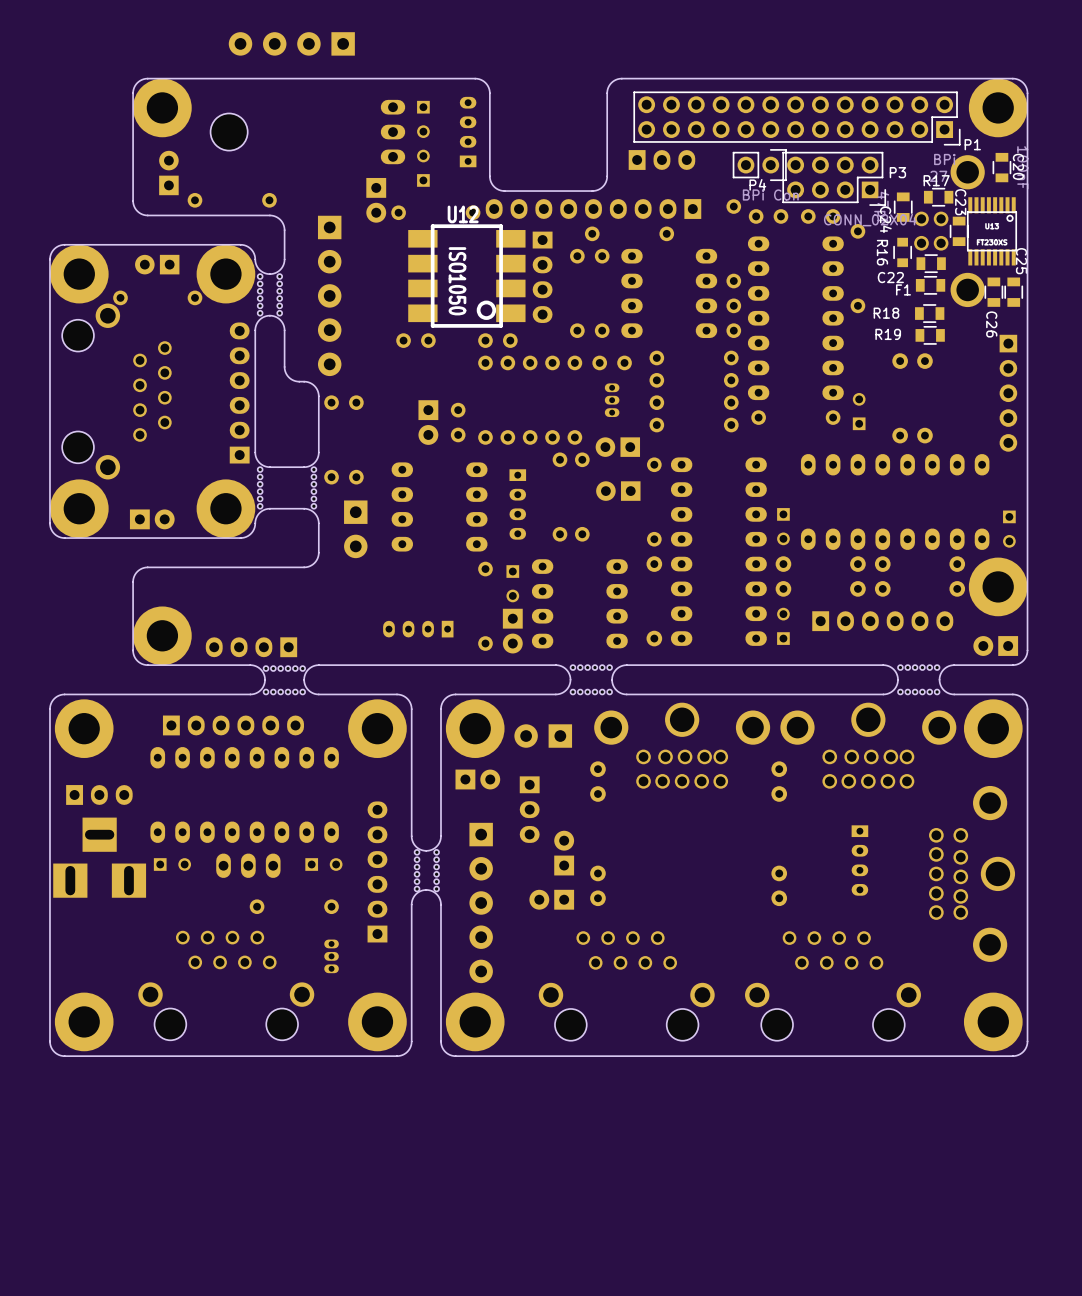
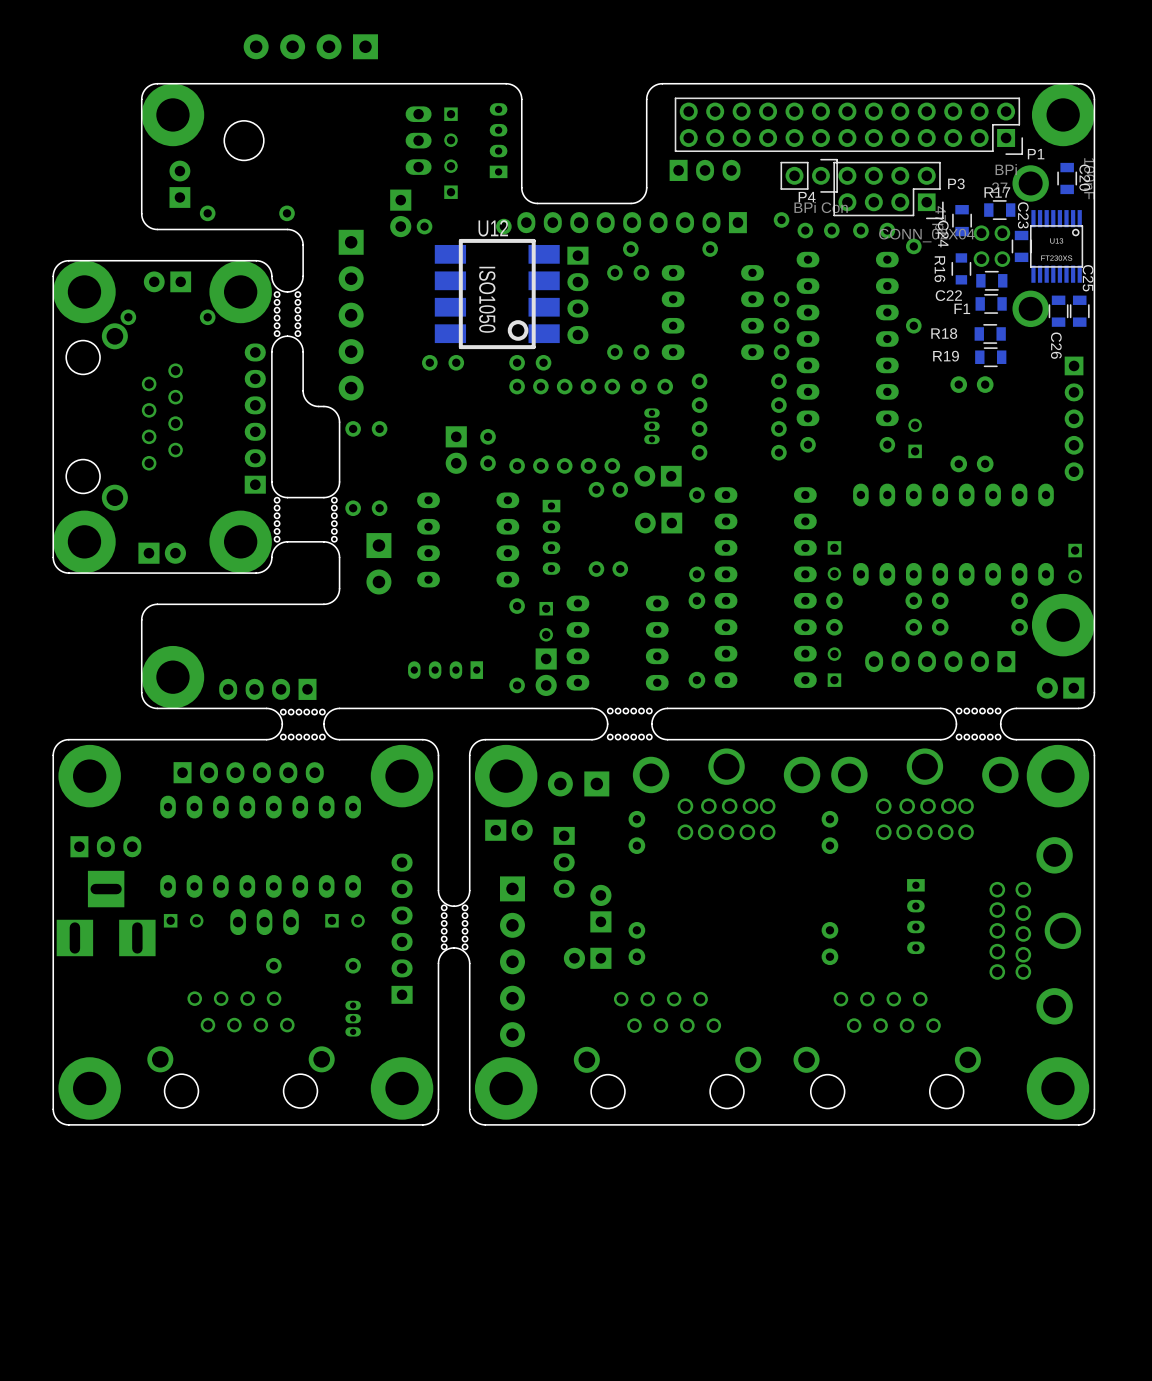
part rotation: 0° (882, 621) -> 180° (940, 661)

